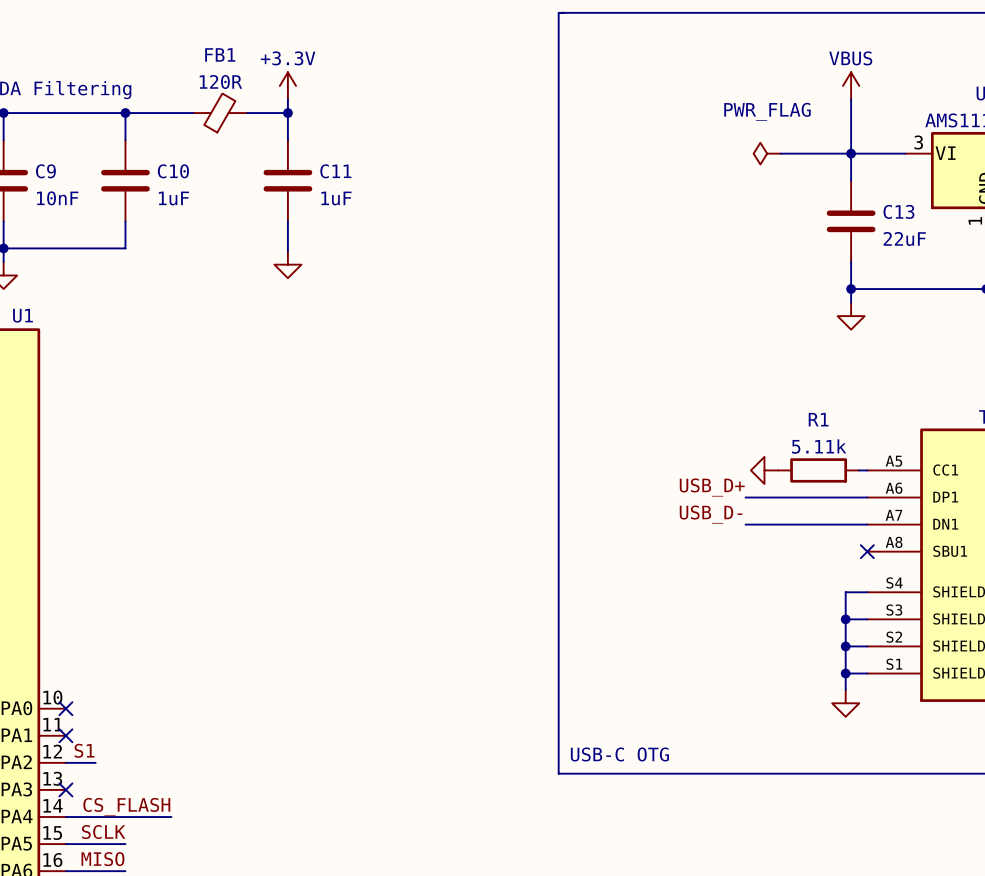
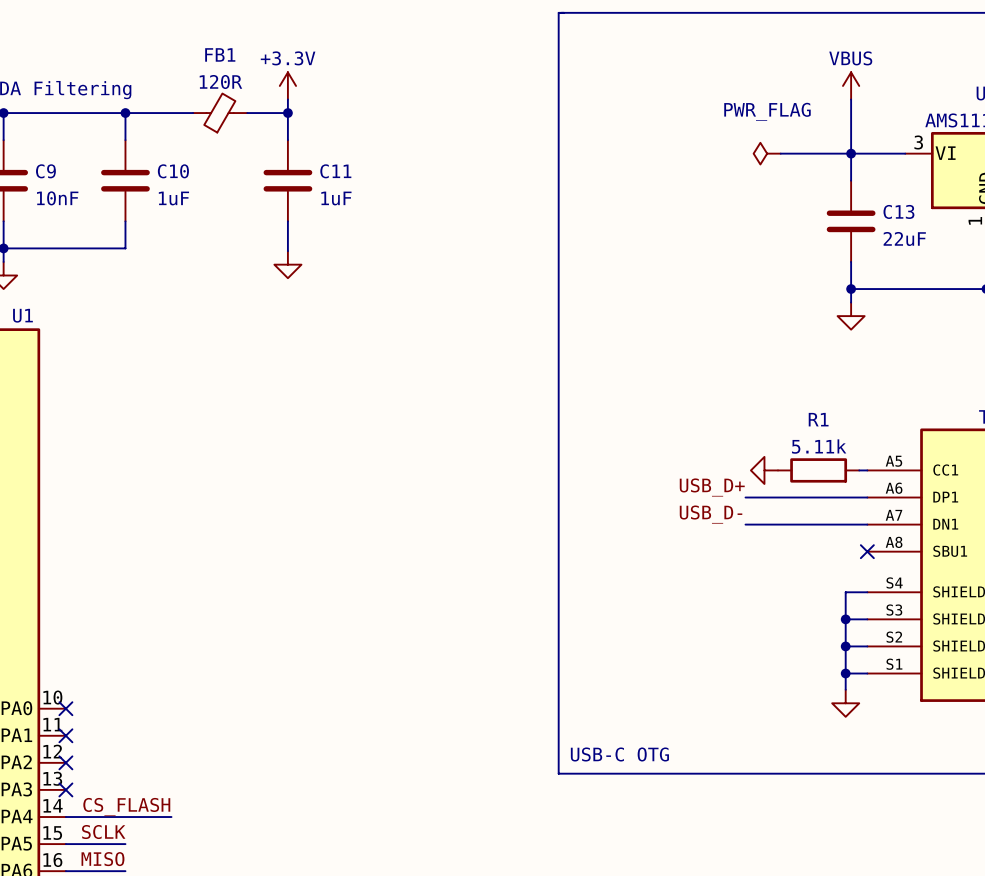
label: S1 (84, 750) -> none
wire: (65, 762) (95, 762) -> none
no-connect mark: none -> (65, 762)

